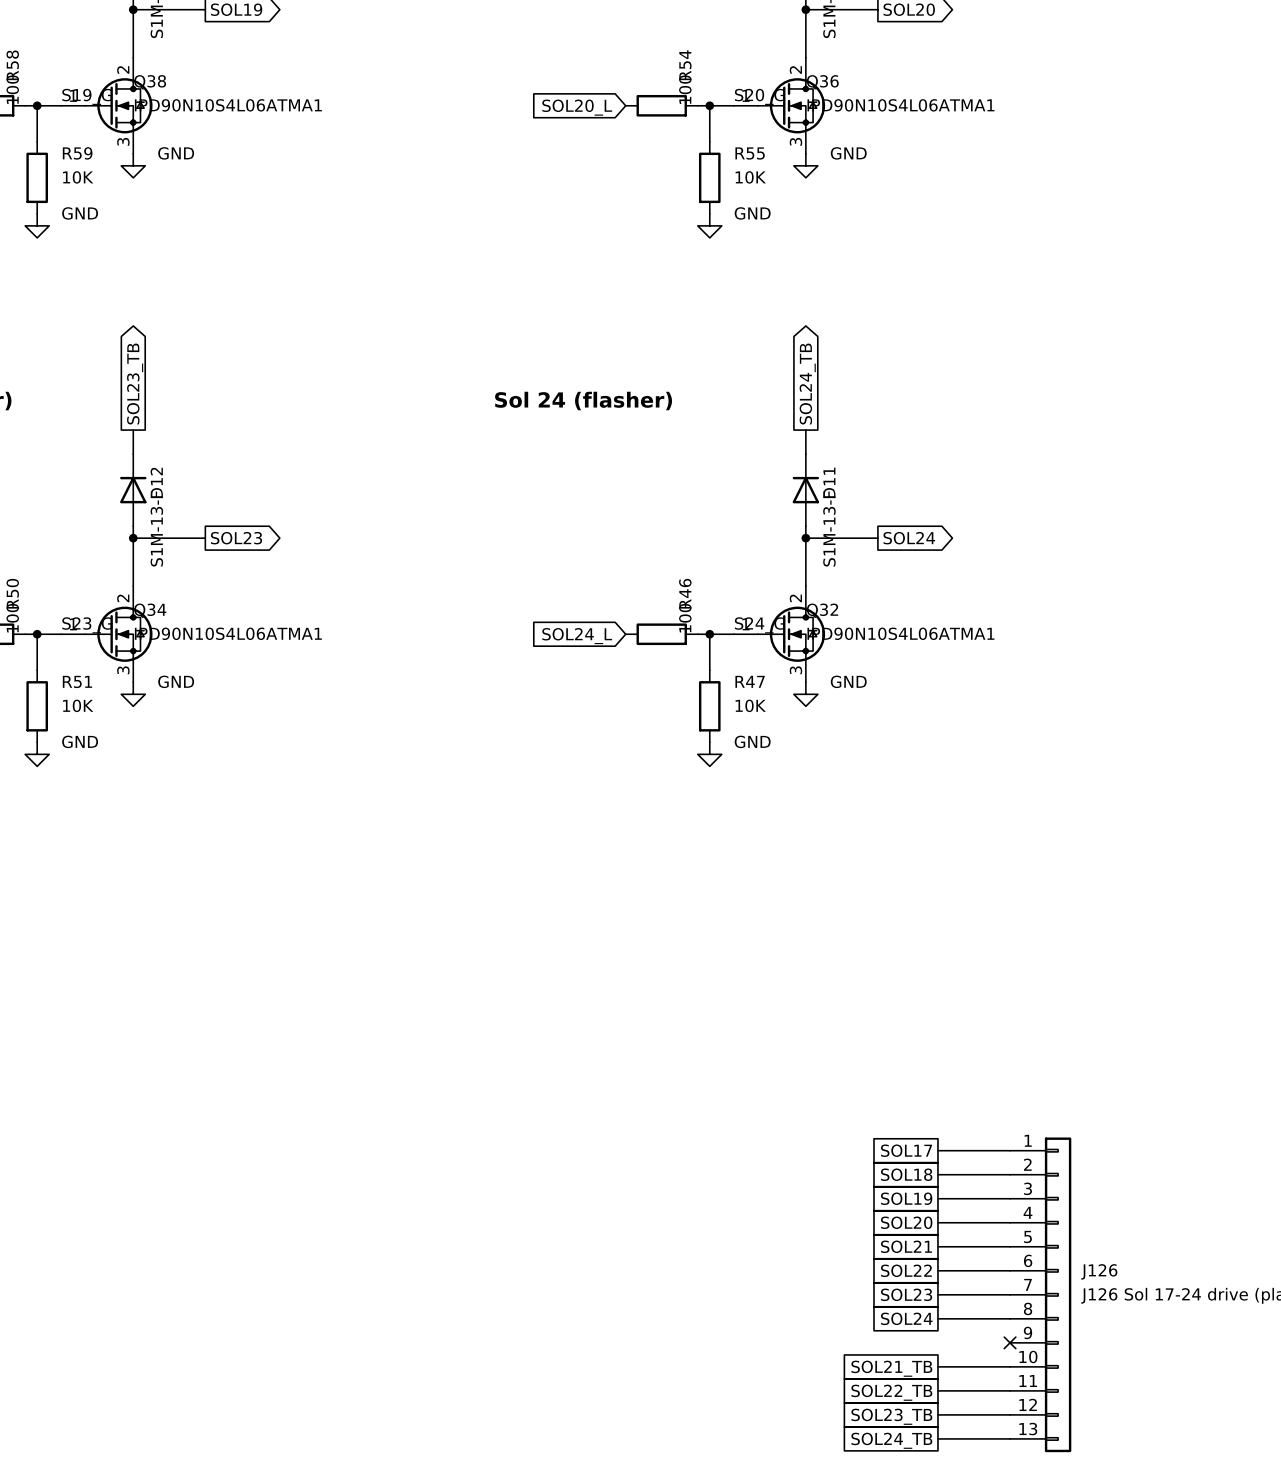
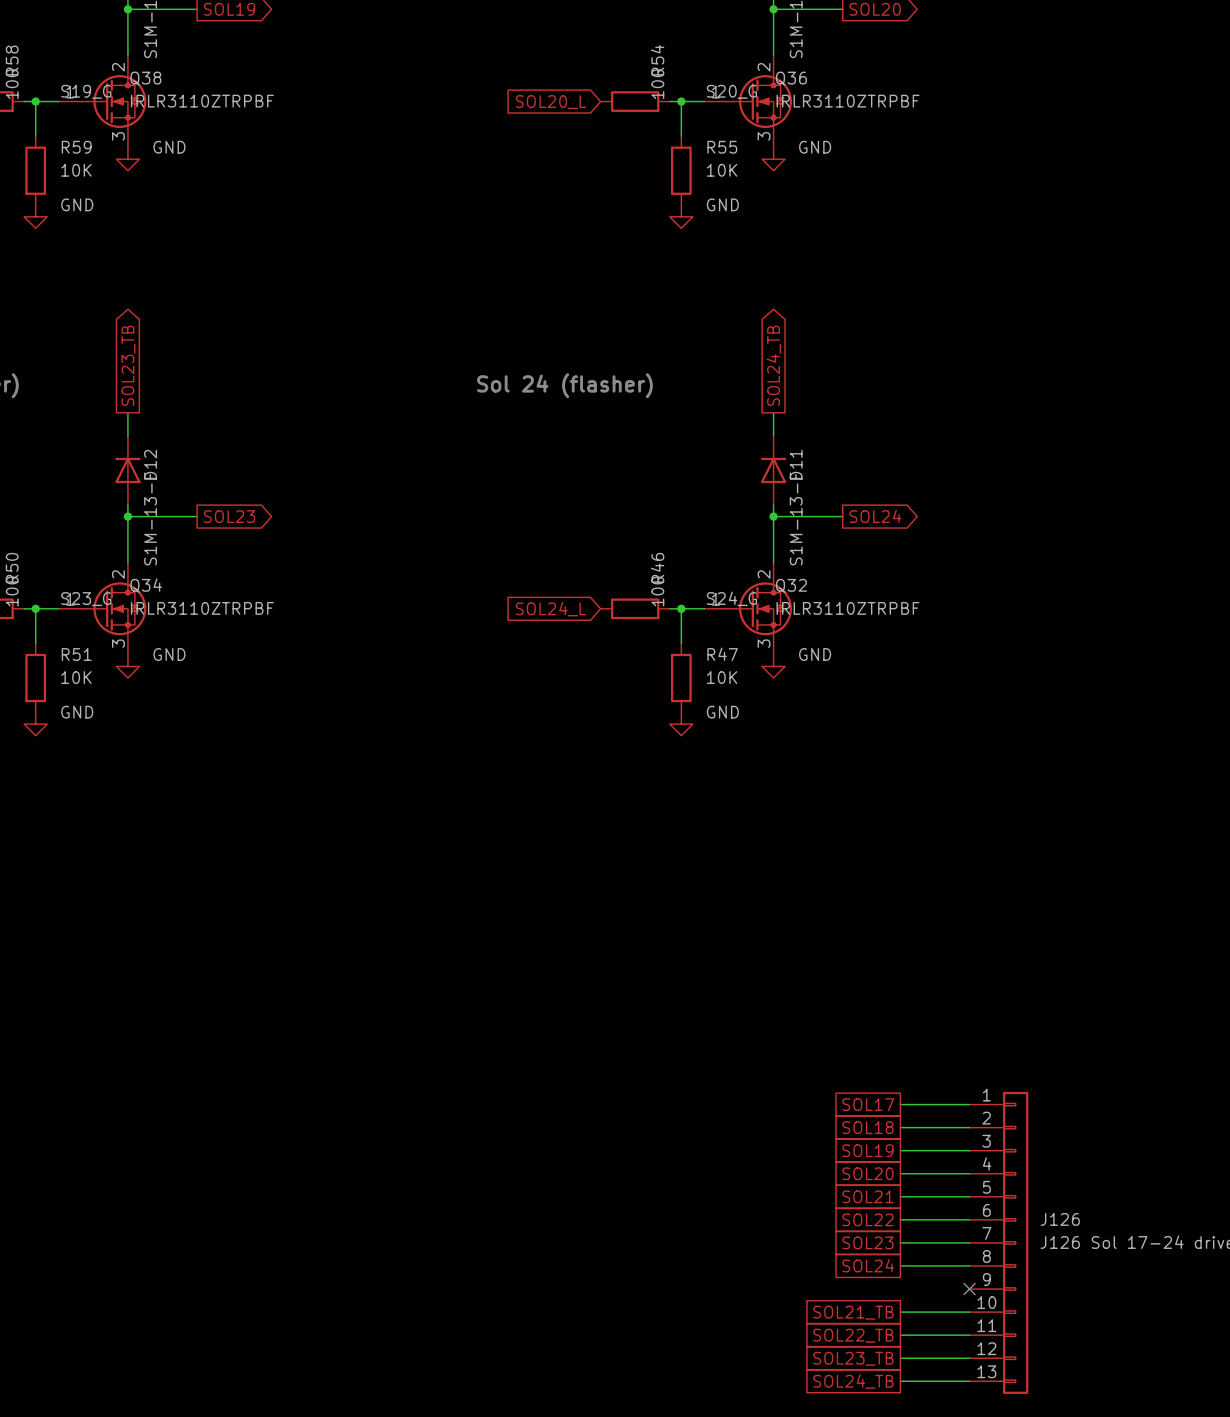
Q38 value: IPD90N10S4L06ATMA1 (228, 105) -> IRLR3110ZTRPBF (202, 101)
Q36 value: IPD90N10S4L06ATMA1 (900, 105) -> IRLR3110ZTRPBF (848, 101)
Q34 value: IPD90N10S4L06ATMA1 (228, 633) -> IRLR3110ZTRPBF (202, 608)
Q32 value: IPD90N10S4L06ATMA1 (900, 633) -> IRLR3110ZTRPBF (848, 608)

